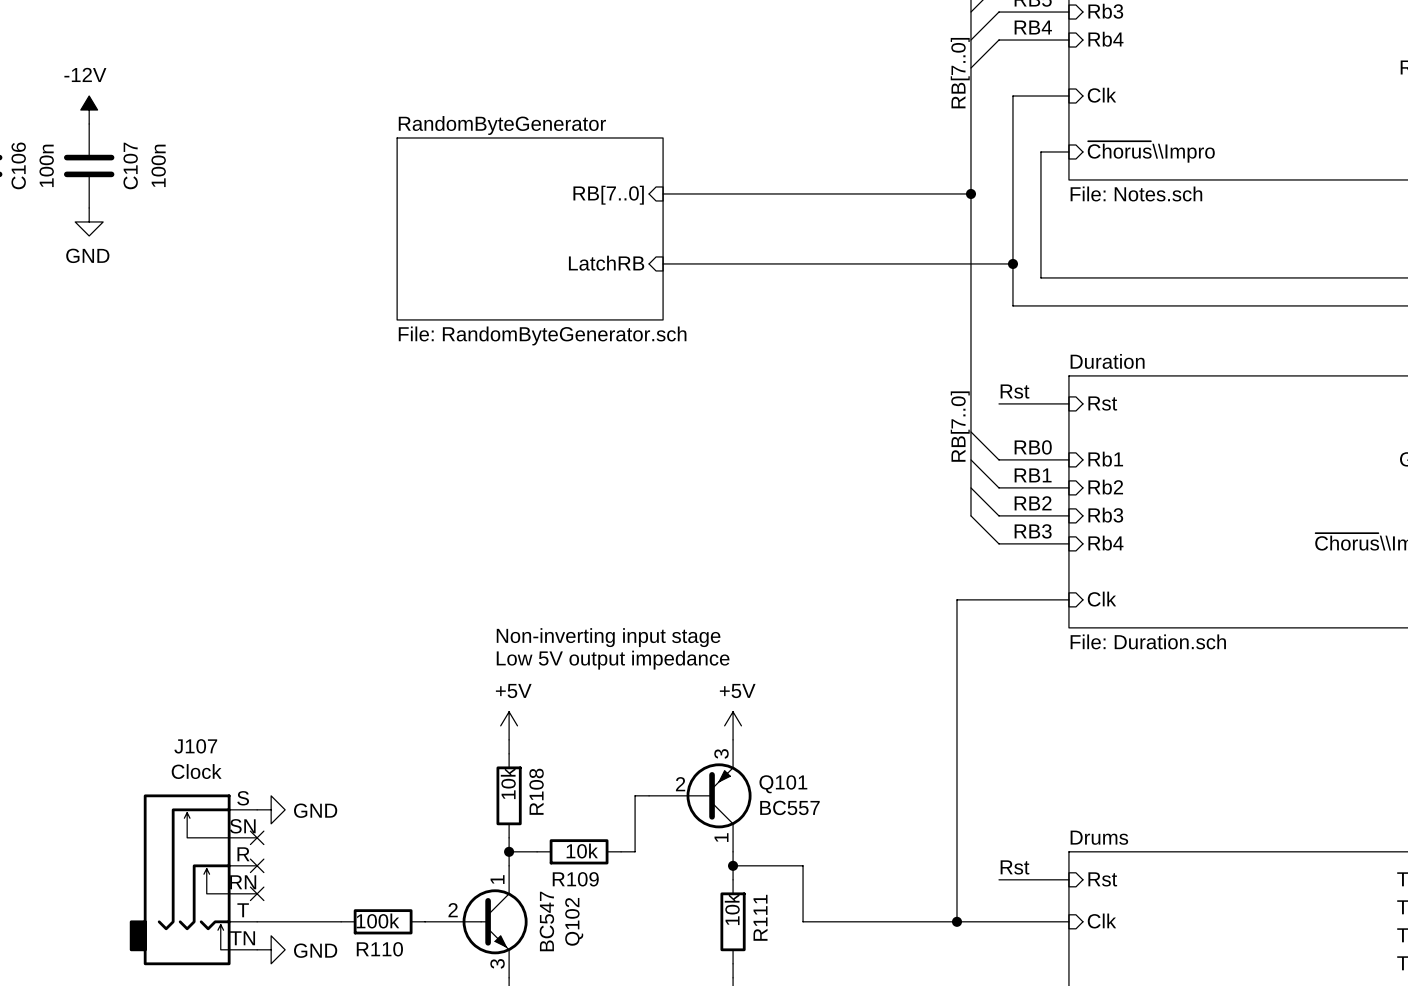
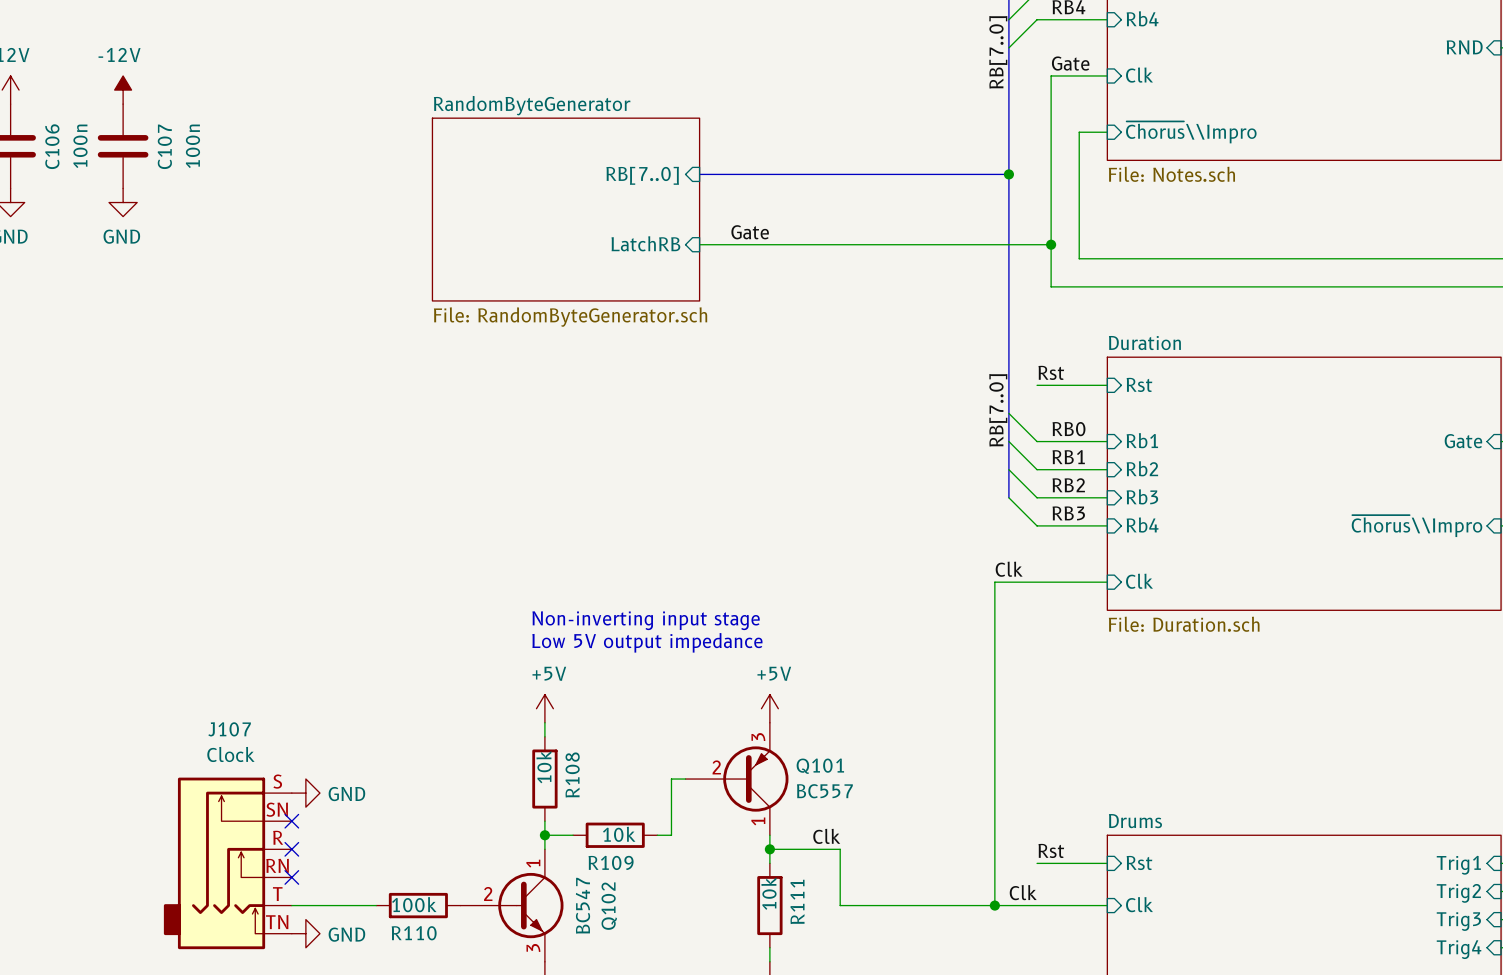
label: none -> Gate (1070, 63)
label: none -> Gate (750, 232)
label: none -> Clk (1009, 569)
label: none -> Clk (826, 836)
label: none -> Clk (1023, 892)

